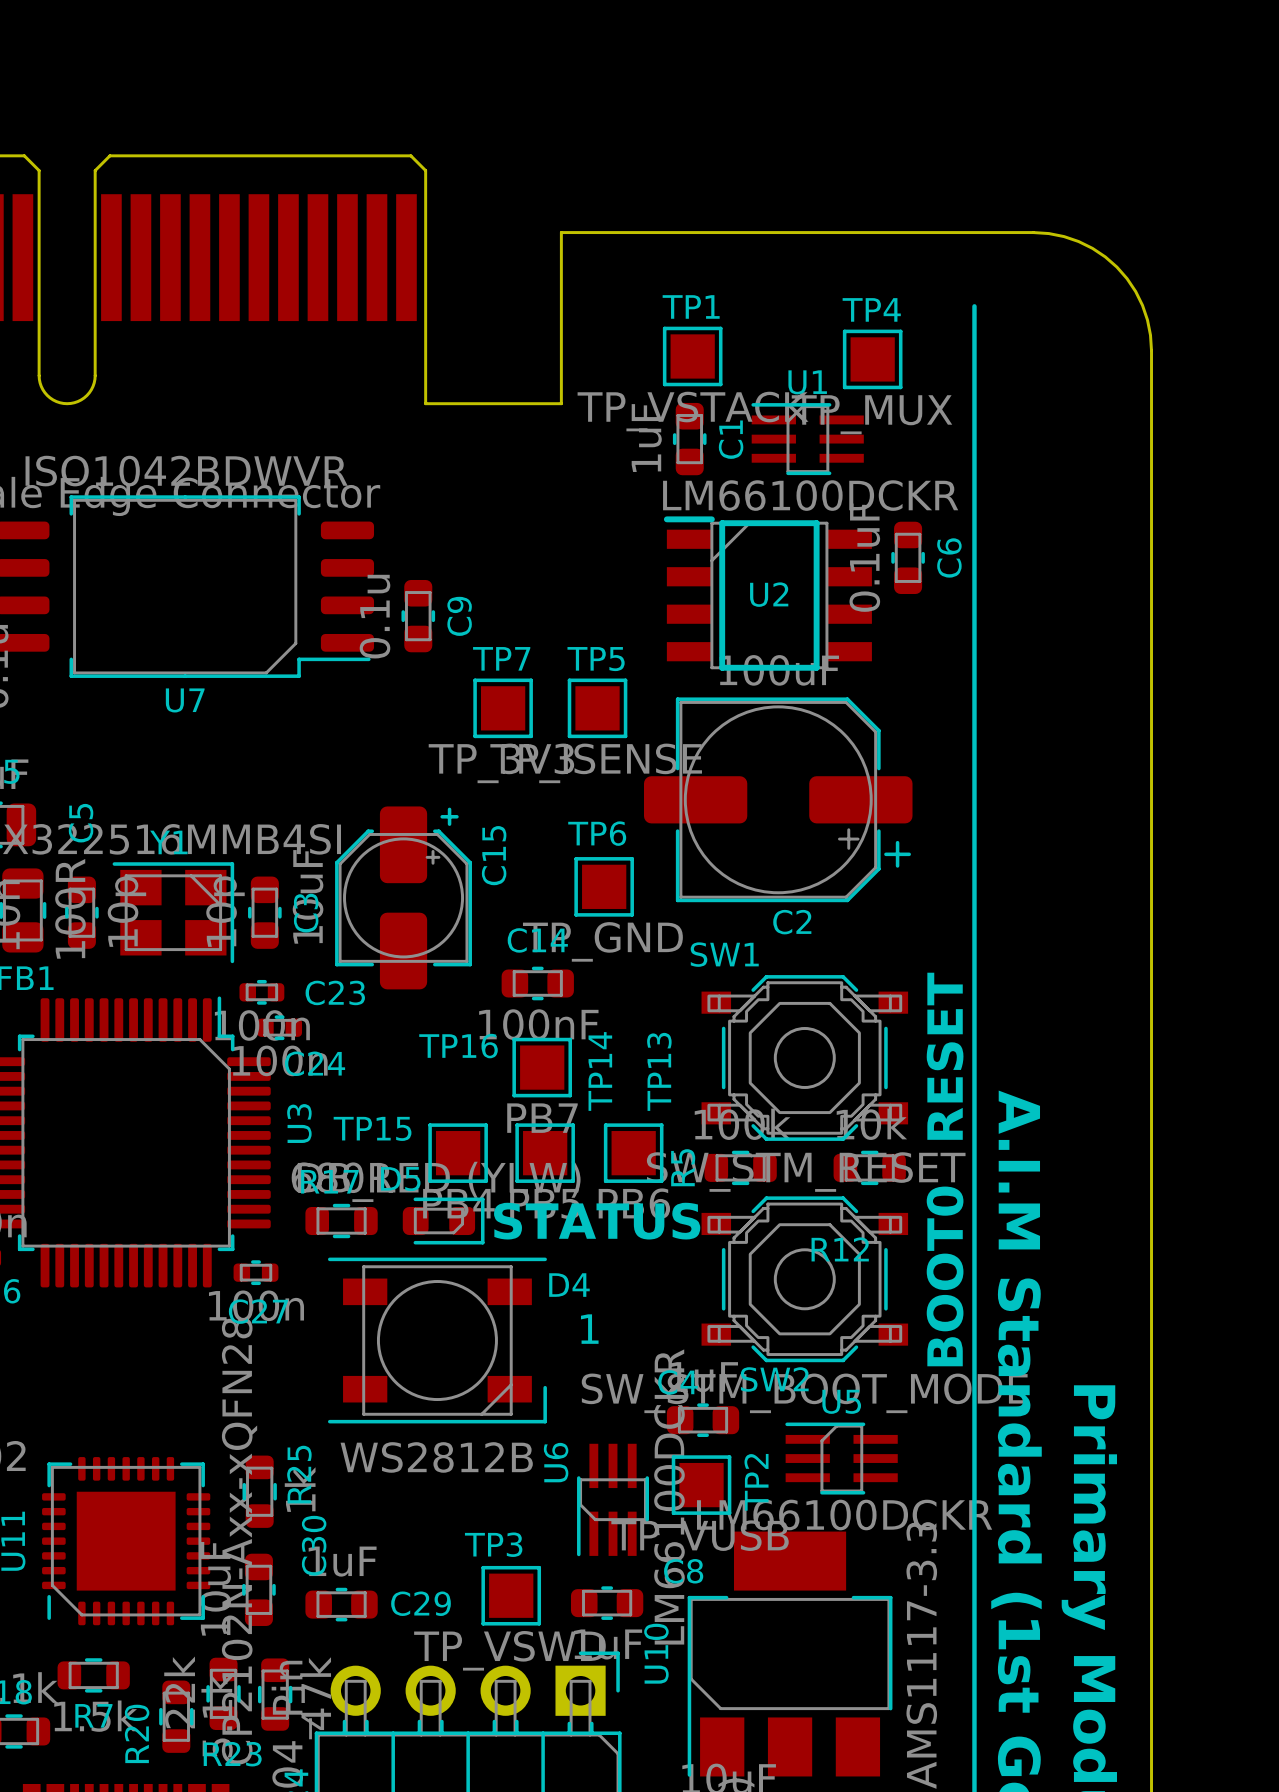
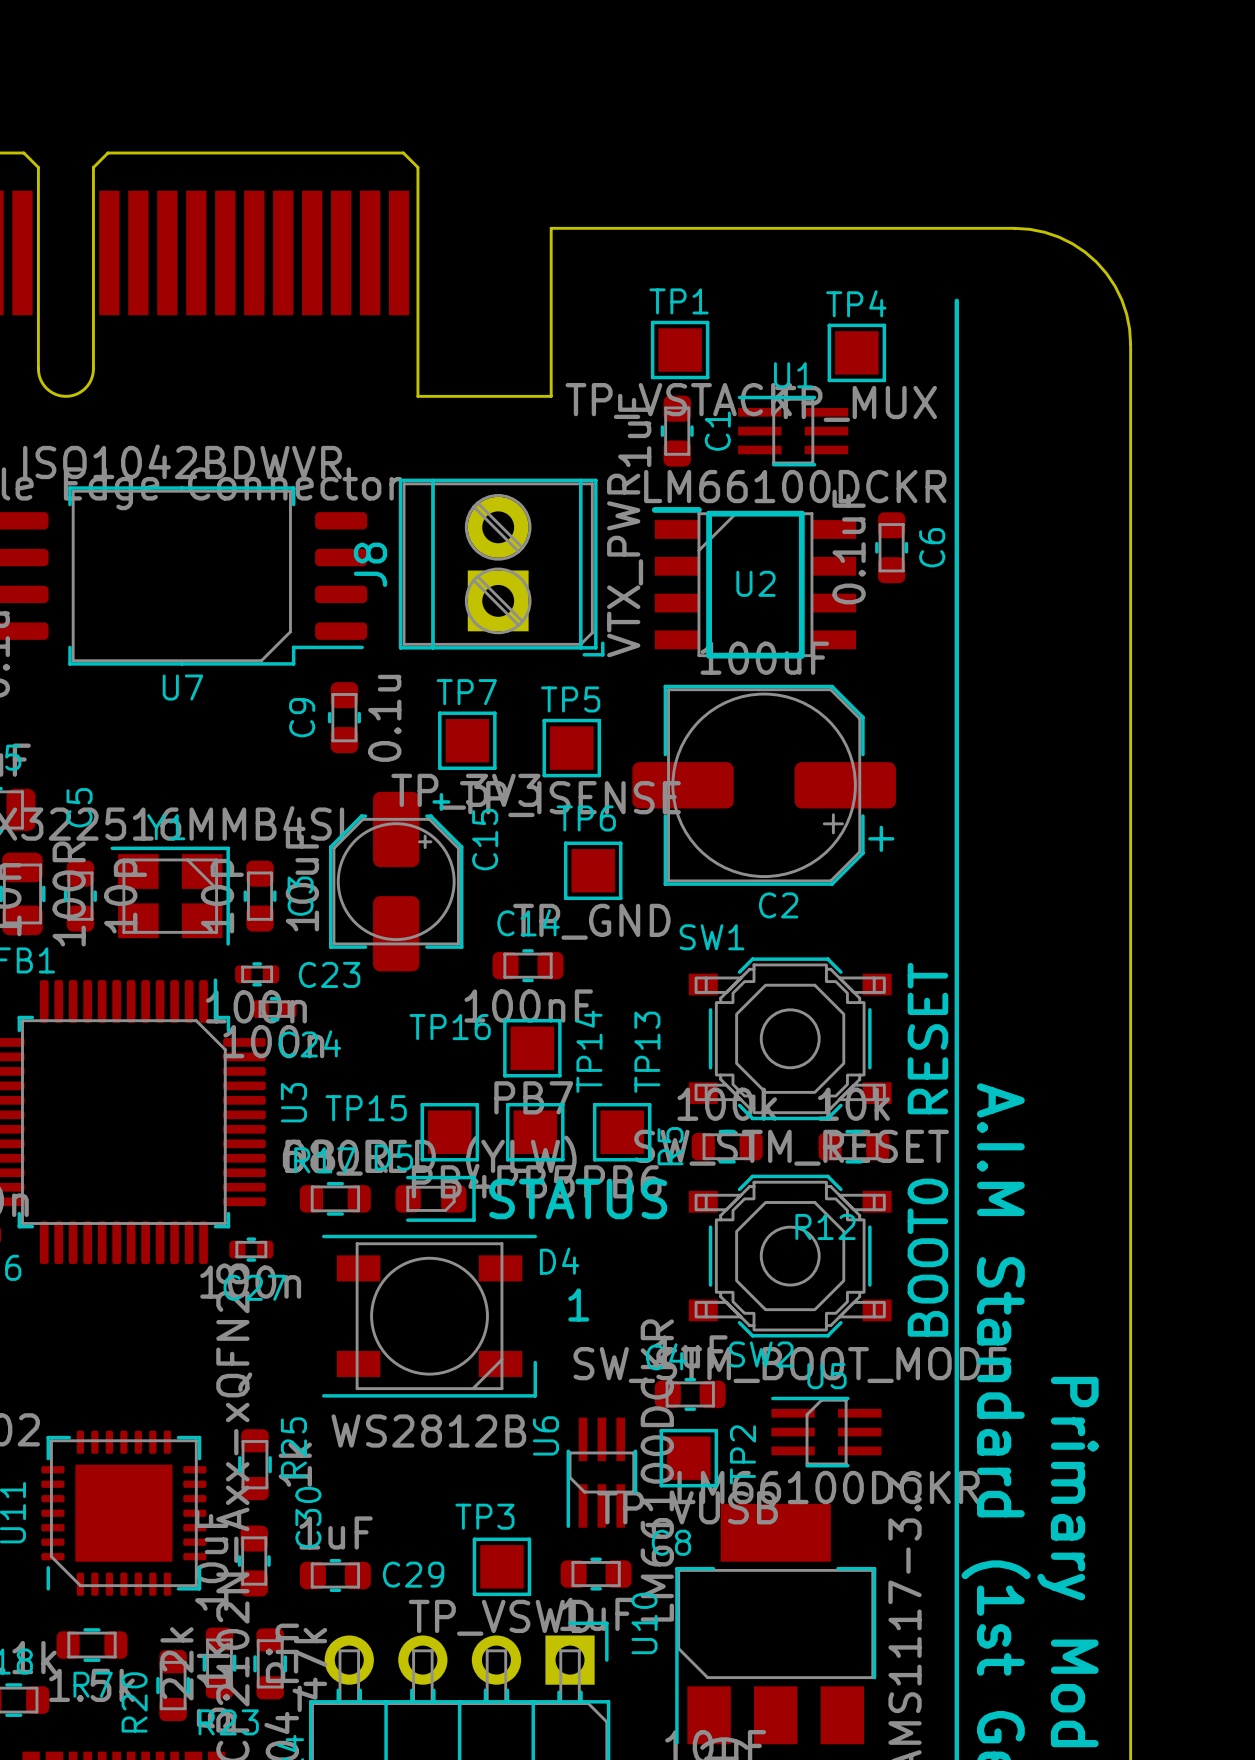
J8: none -> VTX_PWR (501, 567)
C9 value position: 0.1u (375, 616) -> 0.1u (384, 718)
C9 position: (418, 616) -> (344, 717)
C9 name position: C9 (459, 616) -> C9 (302, 717)
TP7 position: (503, 708) -> (467, 740)
TP5 position: (597, 708) -> (571, 748)

